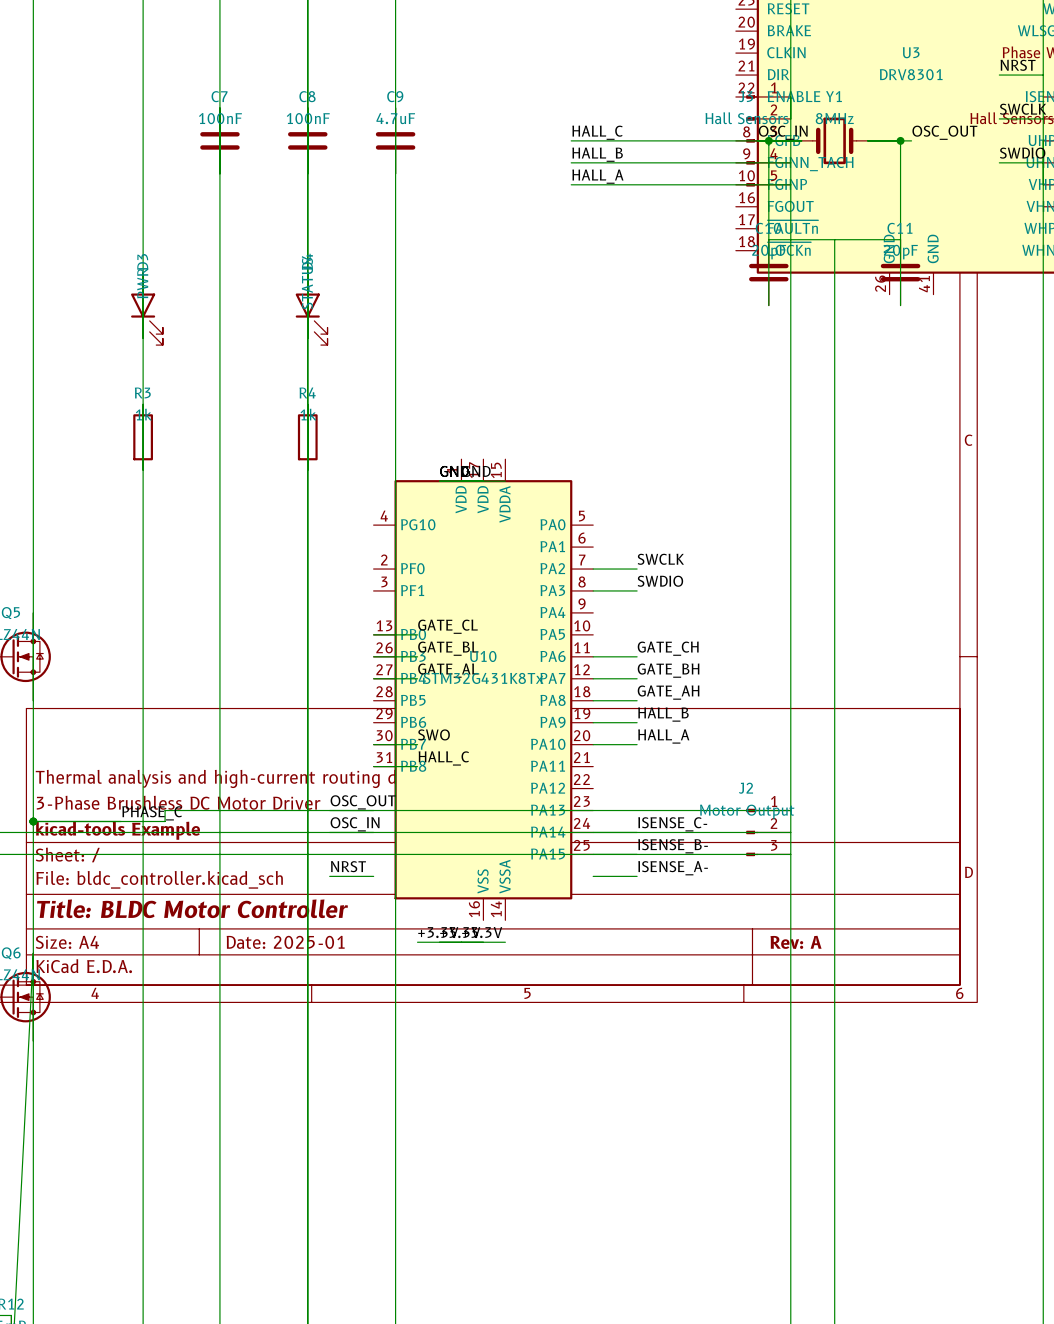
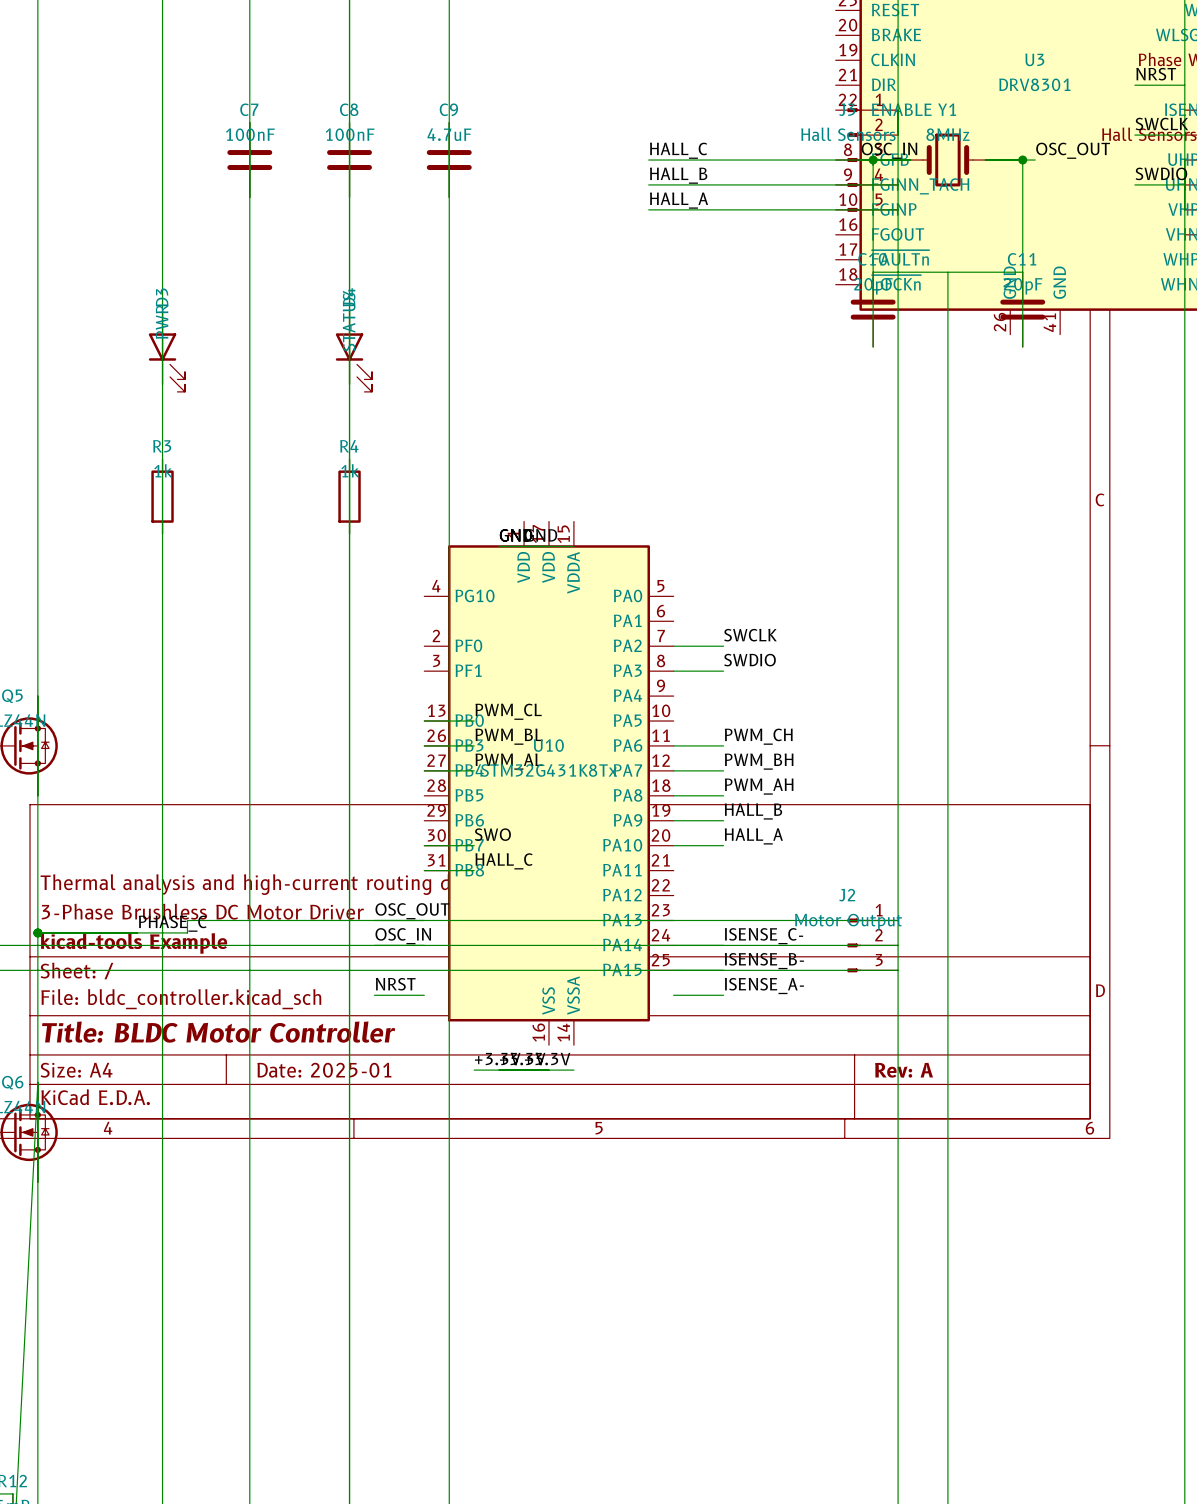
label: GATE_CL (447, 626) -> PWM_CL (508, 711)
label: GATE_BL (448, 648) -> PWM_BL (509, 736)
label: GATE_CH (668, 648) -> PWM_CH (758, 736)
label: GATE_AL (448, 670) -> PWM_AL (509, 761)
label: GATE_BH (668, 670) -> PWM_BH (759, 761)
label: GATE_AH (668, 692) -> PWM_AH (759, 786)

